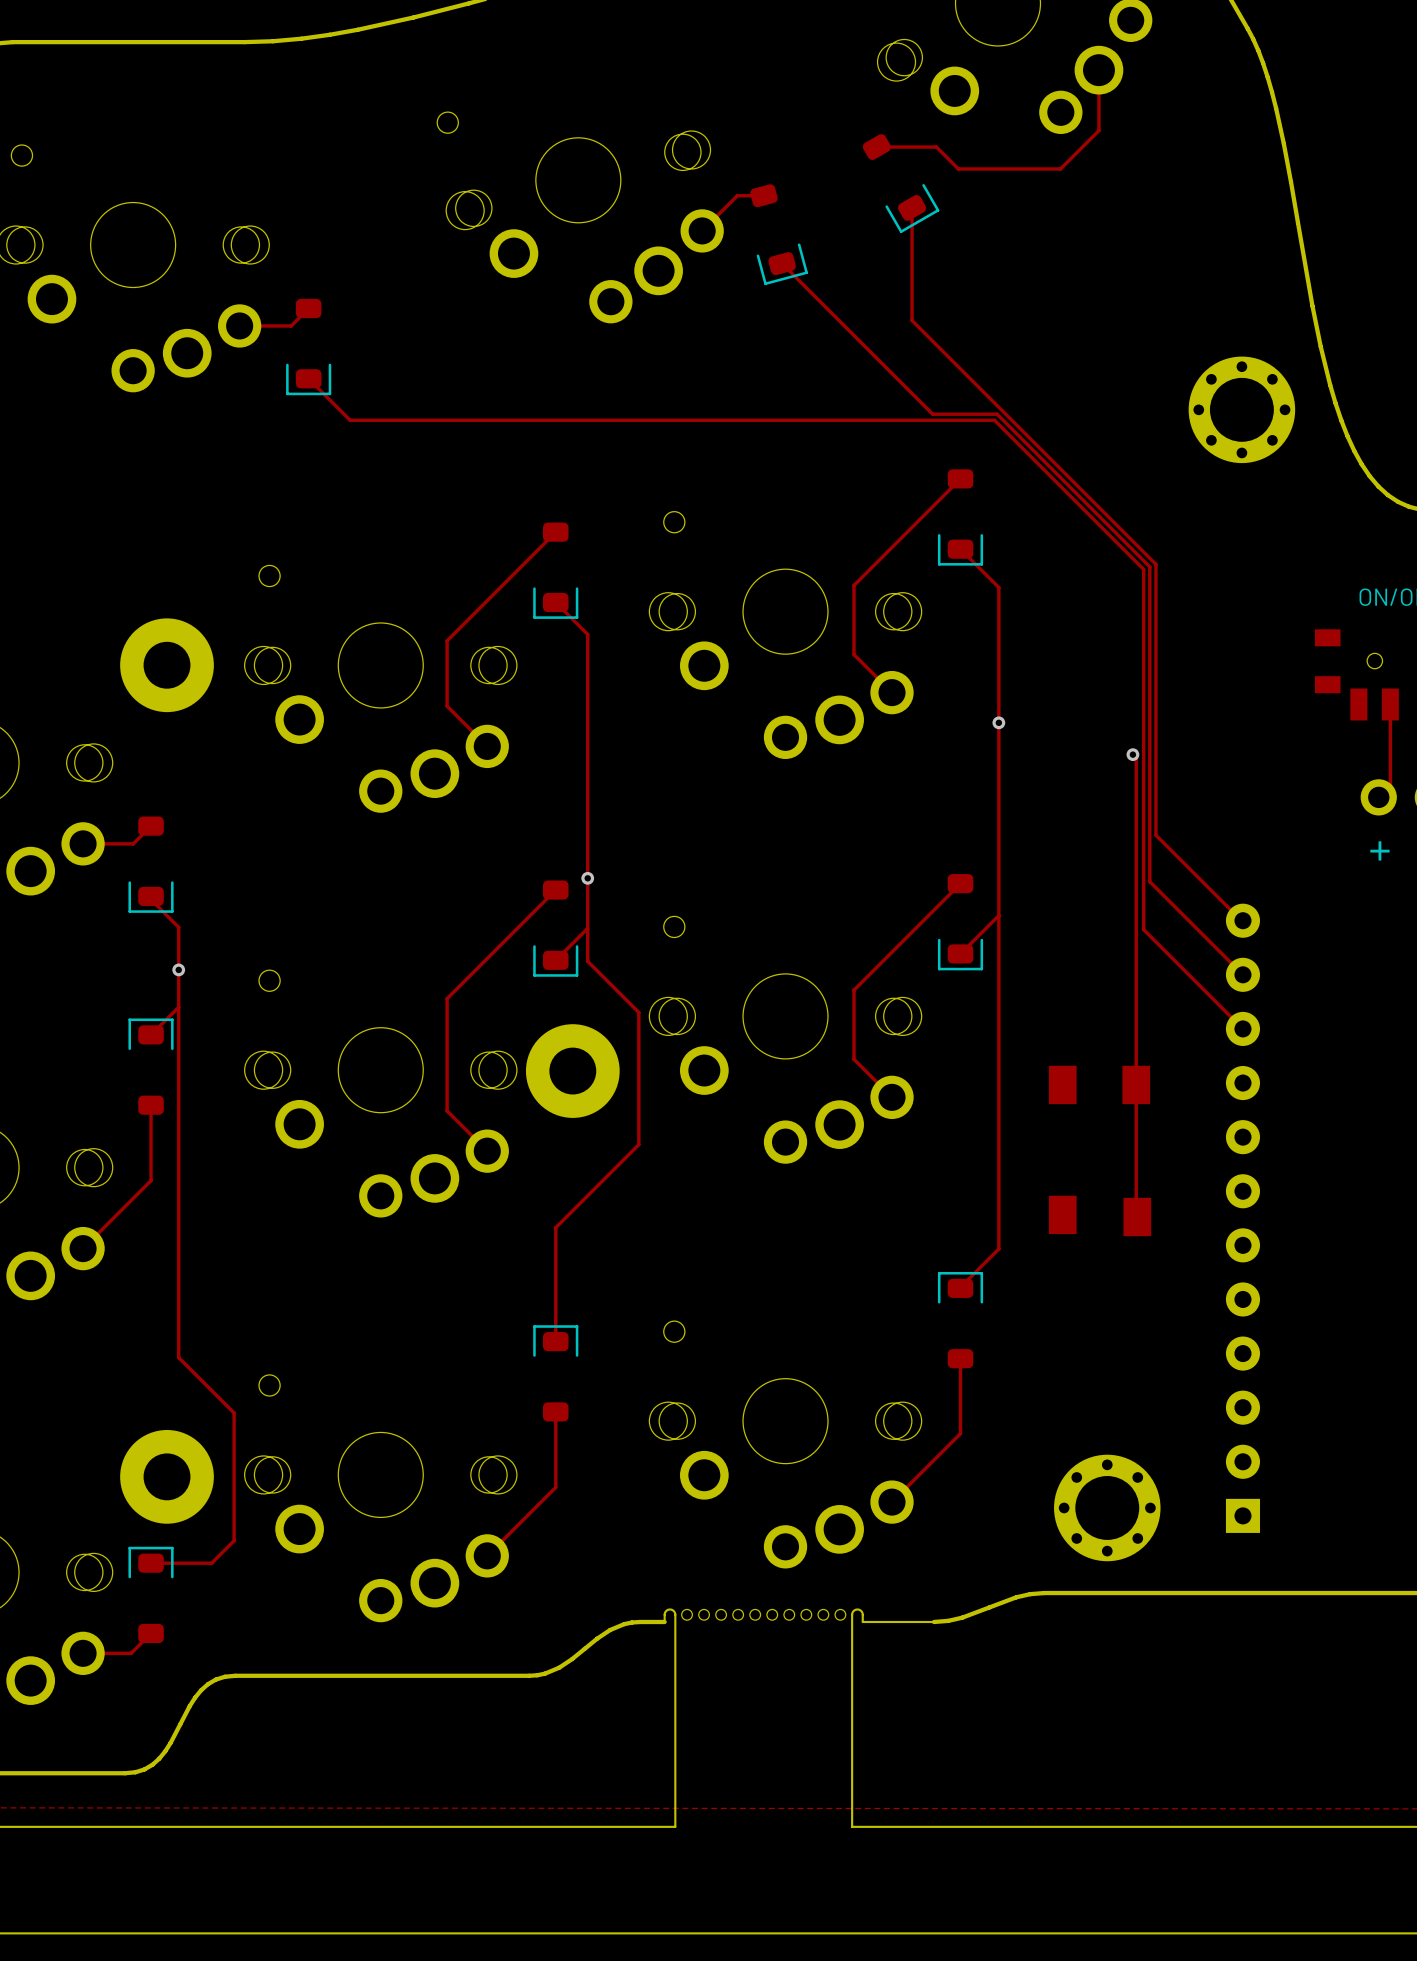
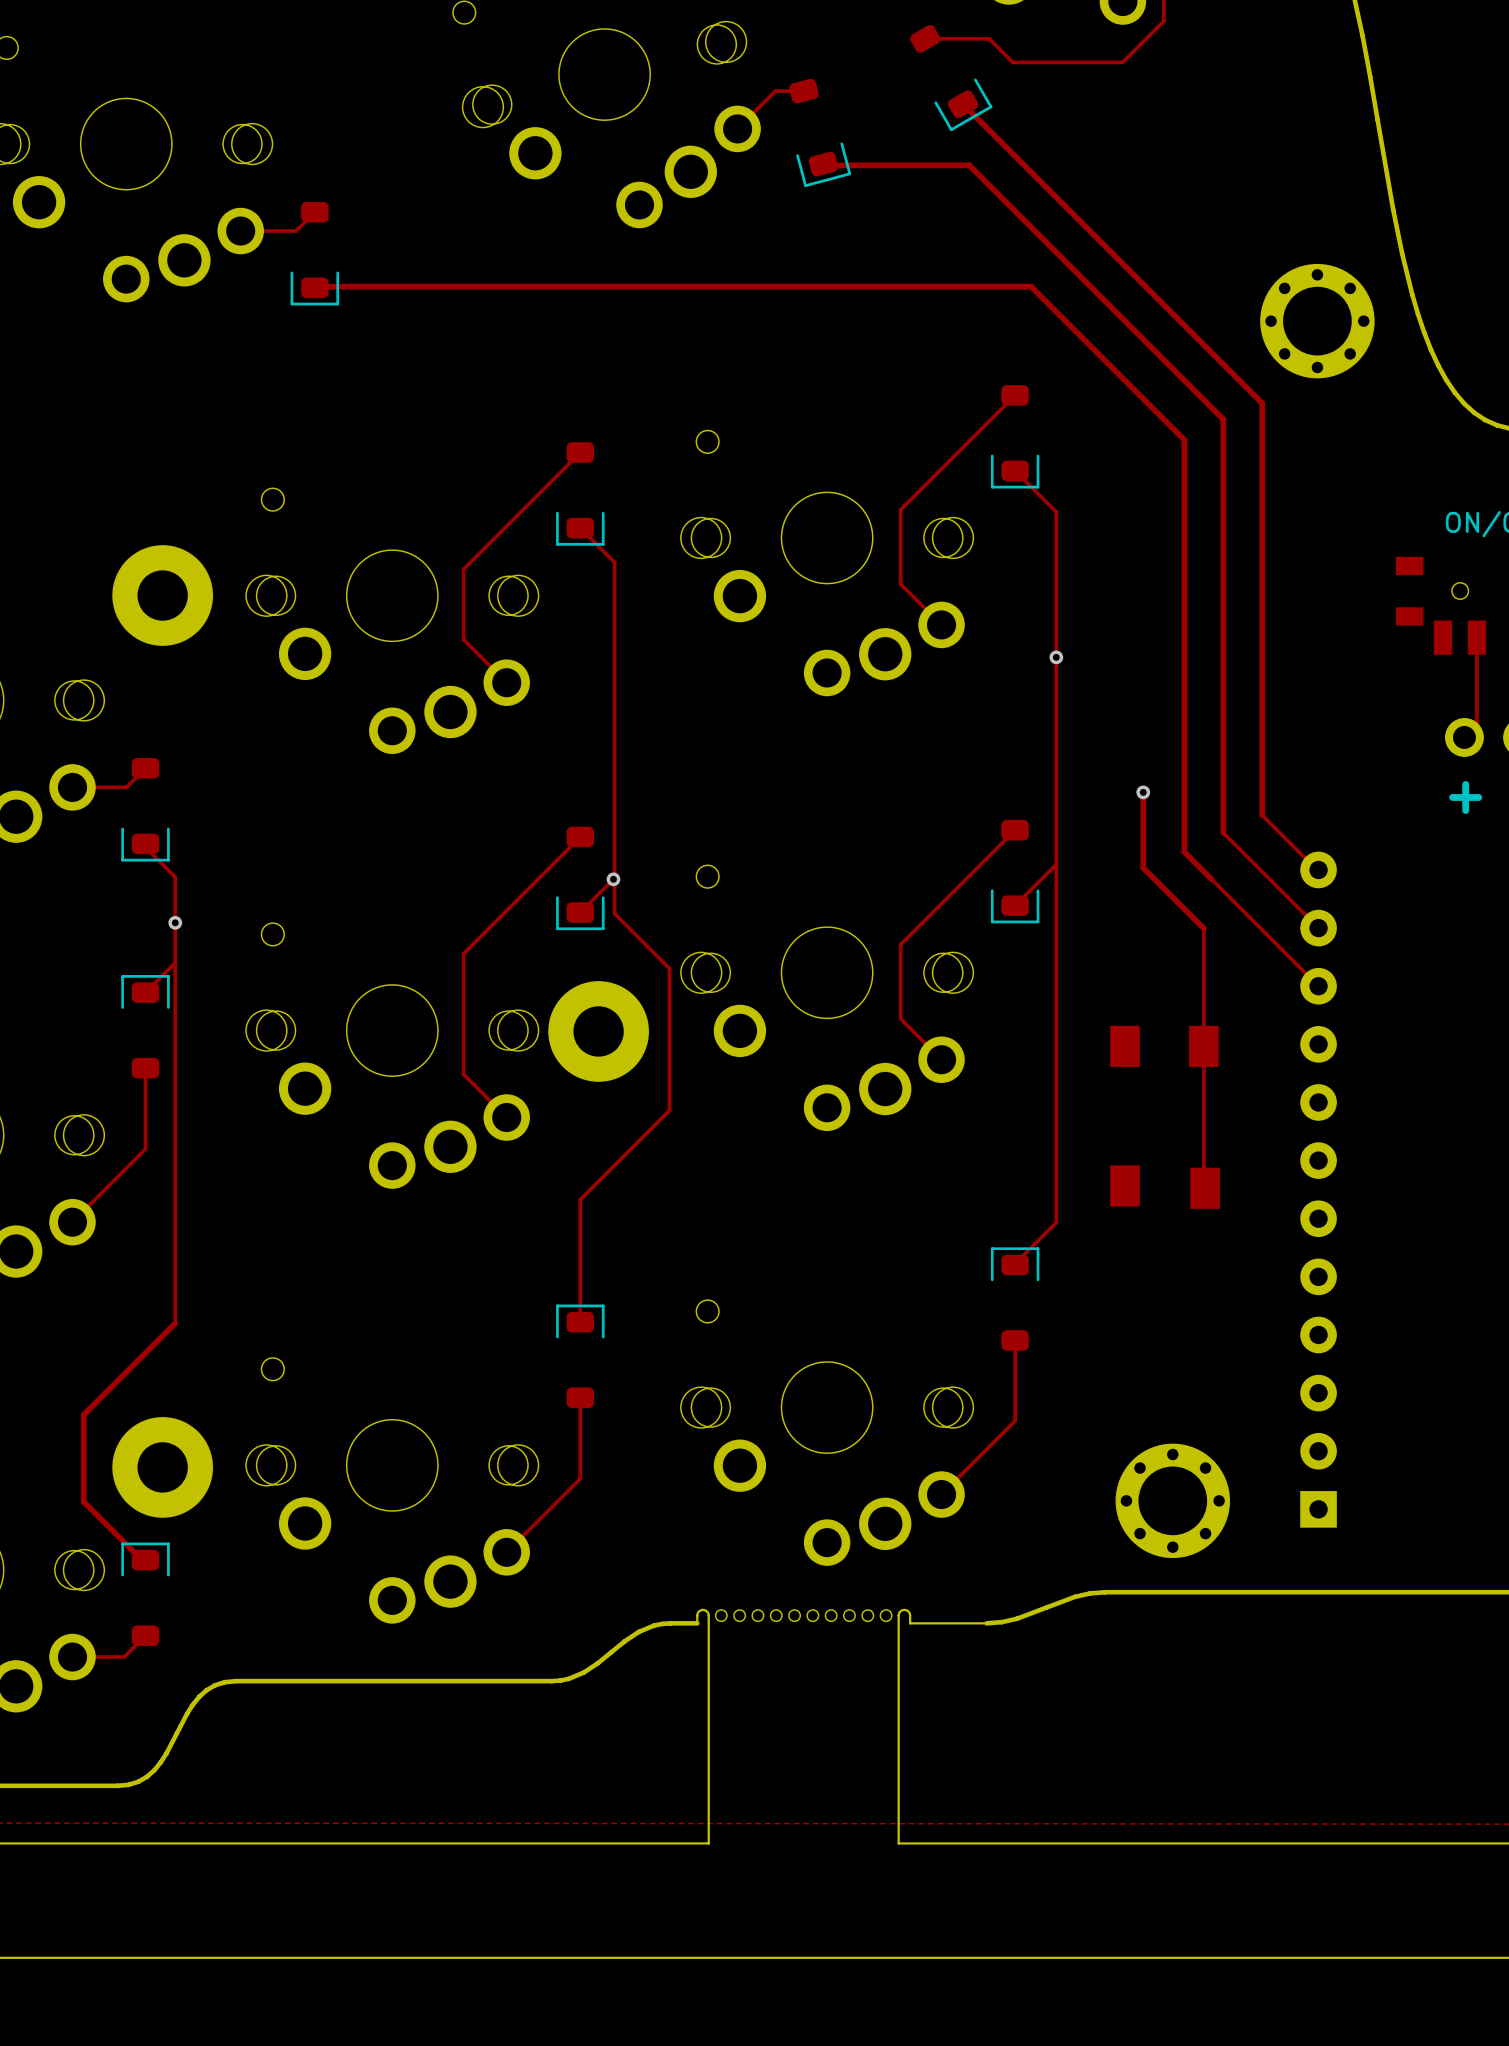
track: (912, 207) (912, 320) (1155, 564) (1155, 835) (1190, 869) -> (963, 104) (1262, 403) (1262, 815)
track: (783, 264) (932, 414) (997, 414) (1149, 566) (1149, 881) (1154, 886) -> (824, 165) (969, 165) (1223, 419) (1223, 832)
track: (308, 378) (350, 420) (994, 420) (1143, 569) (1143, 929) -> (314, 287) (1031, 286) (1184, 439) (1184, 852) (1211, 879)
track: (1132, 754) (1136, 757) (1136, 975) -> (1143, 792) (1143, 867) (1203, 928)
via position: (1132, 754) -> (1143, 792)
via position: (587, 878) -> (613, 879)
track: (178, 1342) (178, 1357) (234, 1413) (234, 1540) (211, 1563) (151, 1563) -> (175, 1323) (83, 1414) (83, 1501) (142, 1560) (145, 1560)

